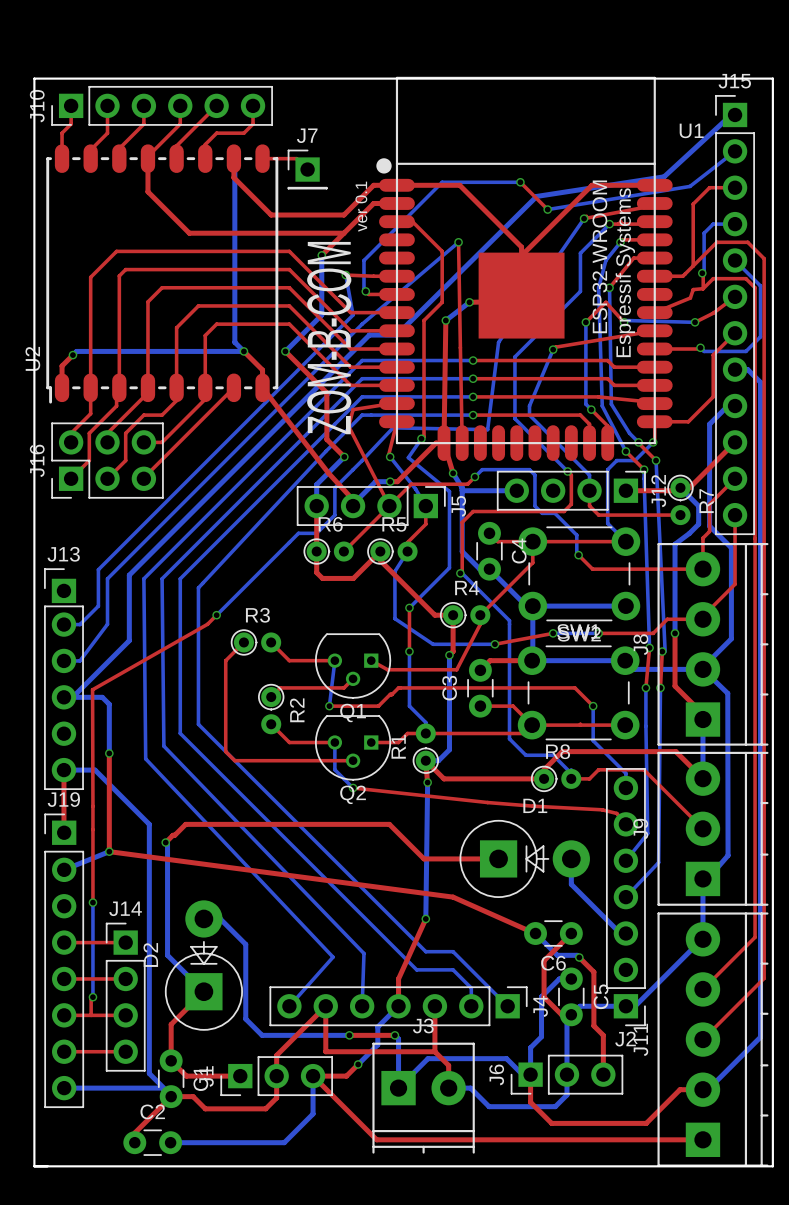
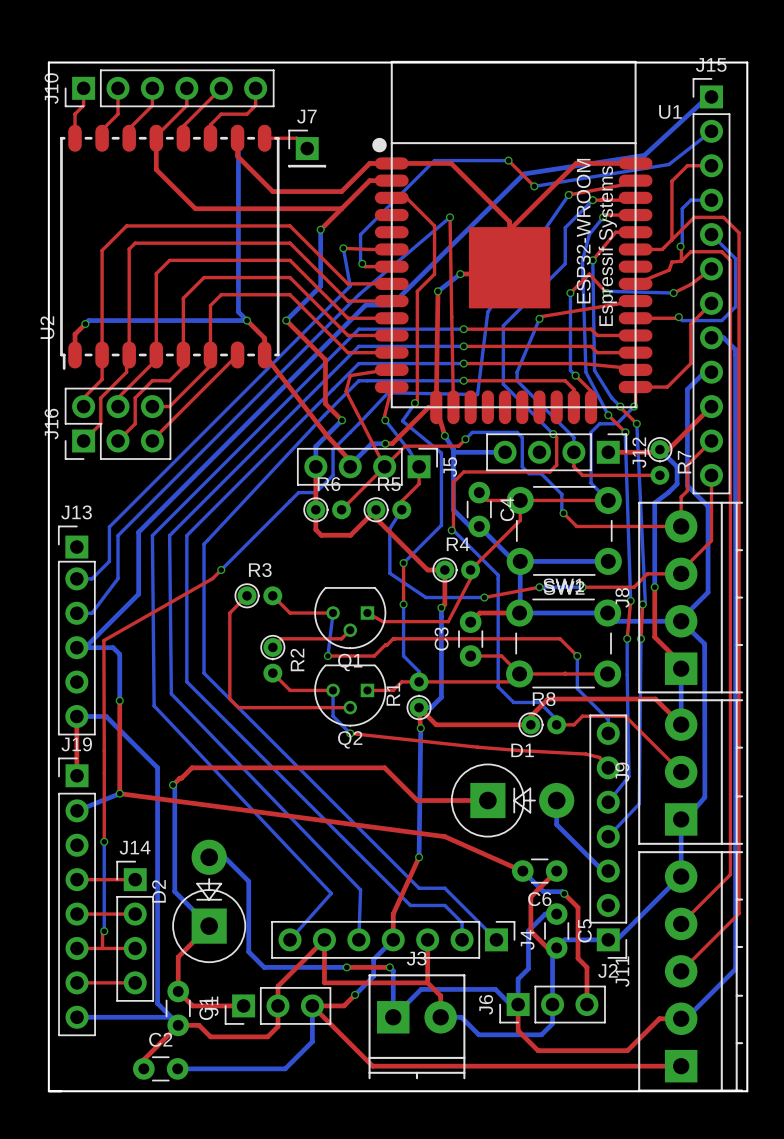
text: ver 0.1 (361, 206) -> none
text: ZOM-B-COM (329, 338) -> none

